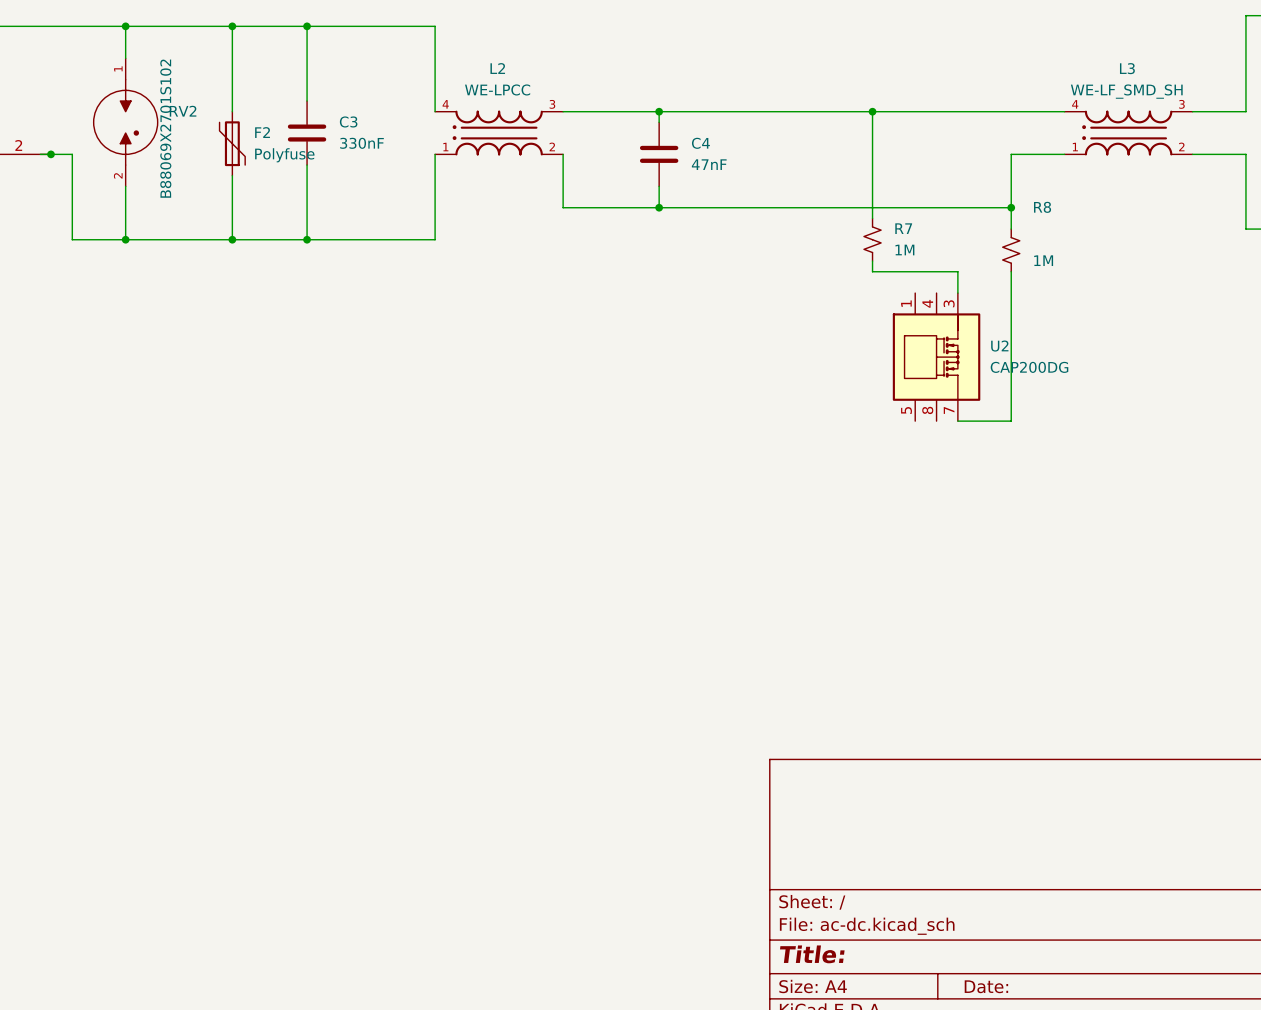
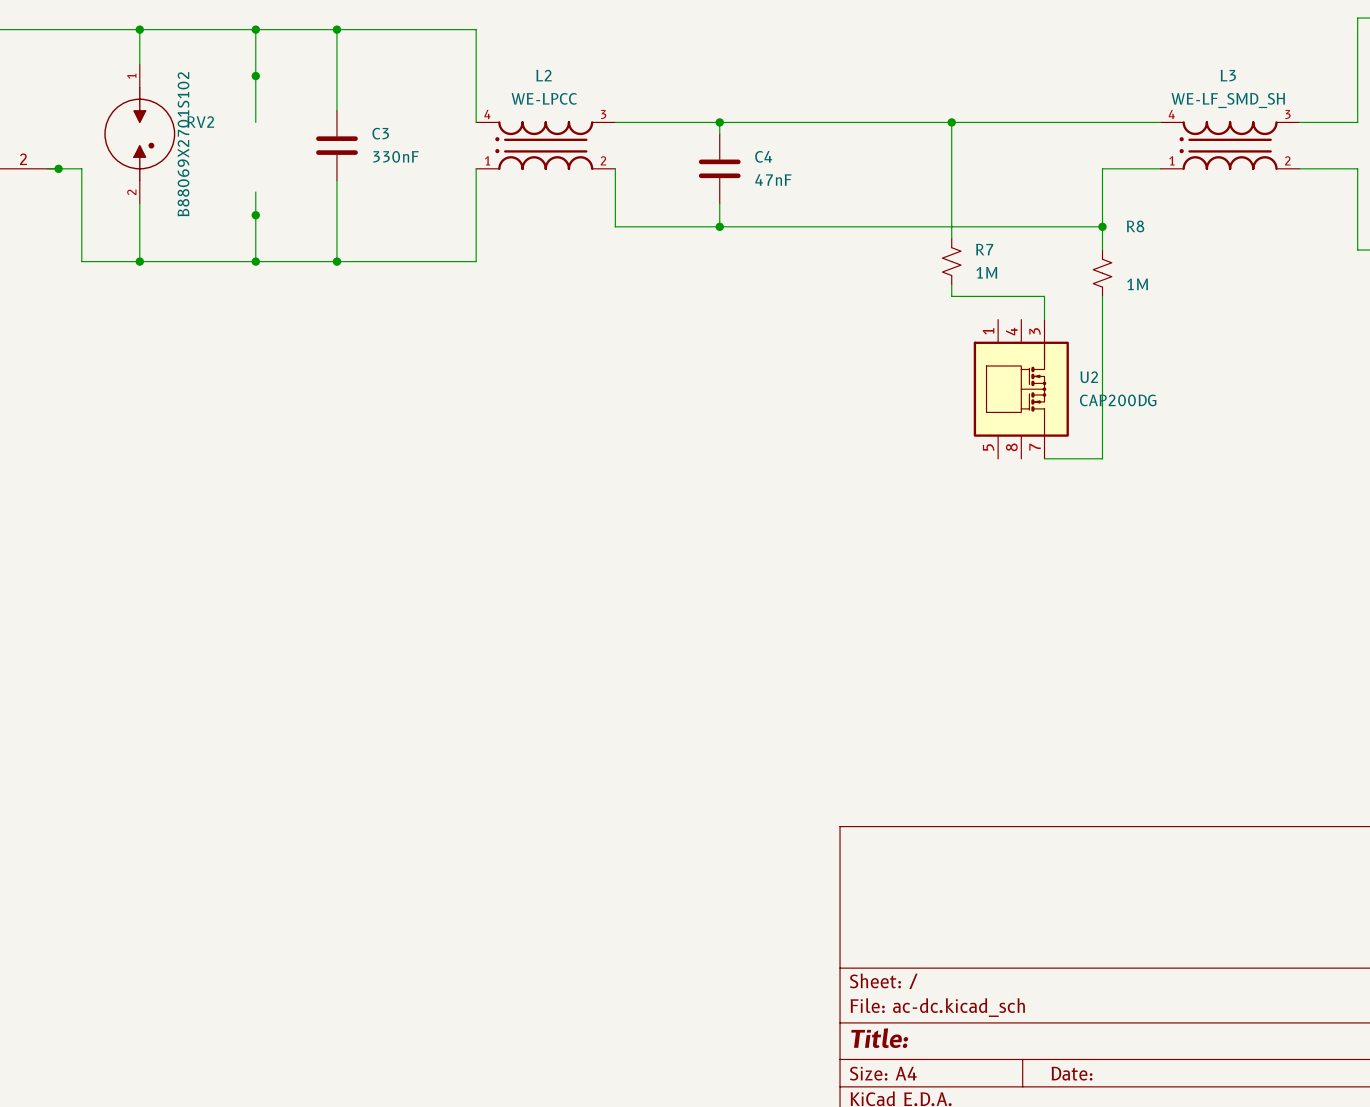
junction: none -> (255, 76)
F2: Polyfuse (232, 143) -> none
junction: none -> (255, 215)

